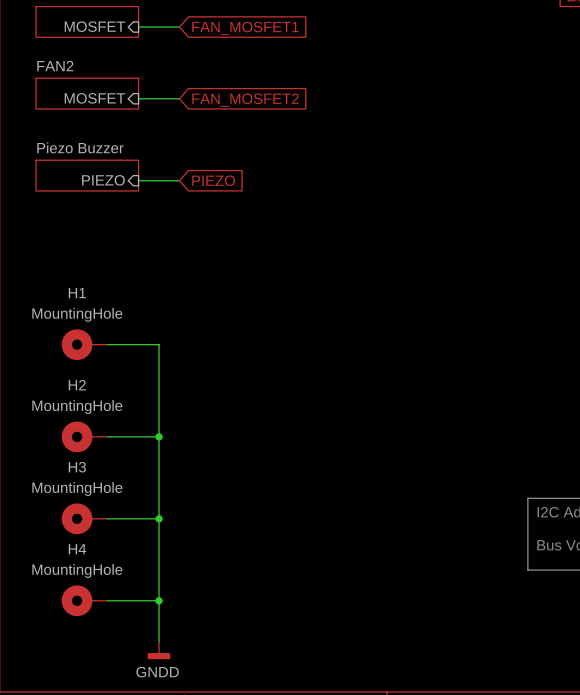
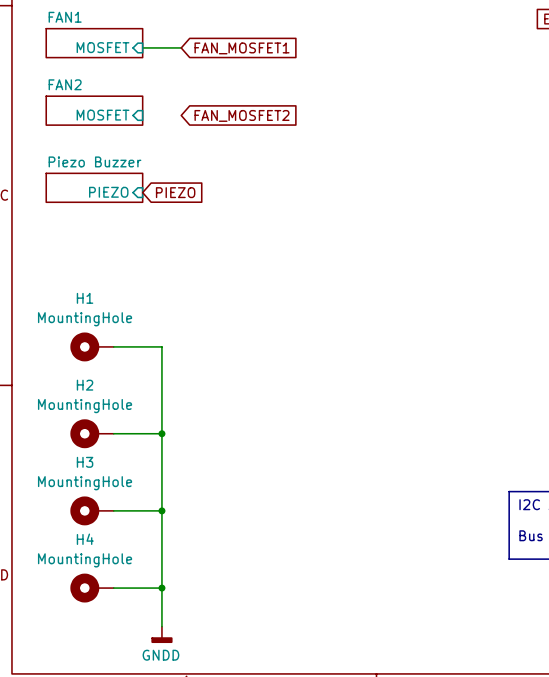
wire: (138, 98) (179, 98) -> none
wire: (138, 180) (179, 180) -> none
global label position: PIEZO (213, 180) -> PIEZO (175, 192)

